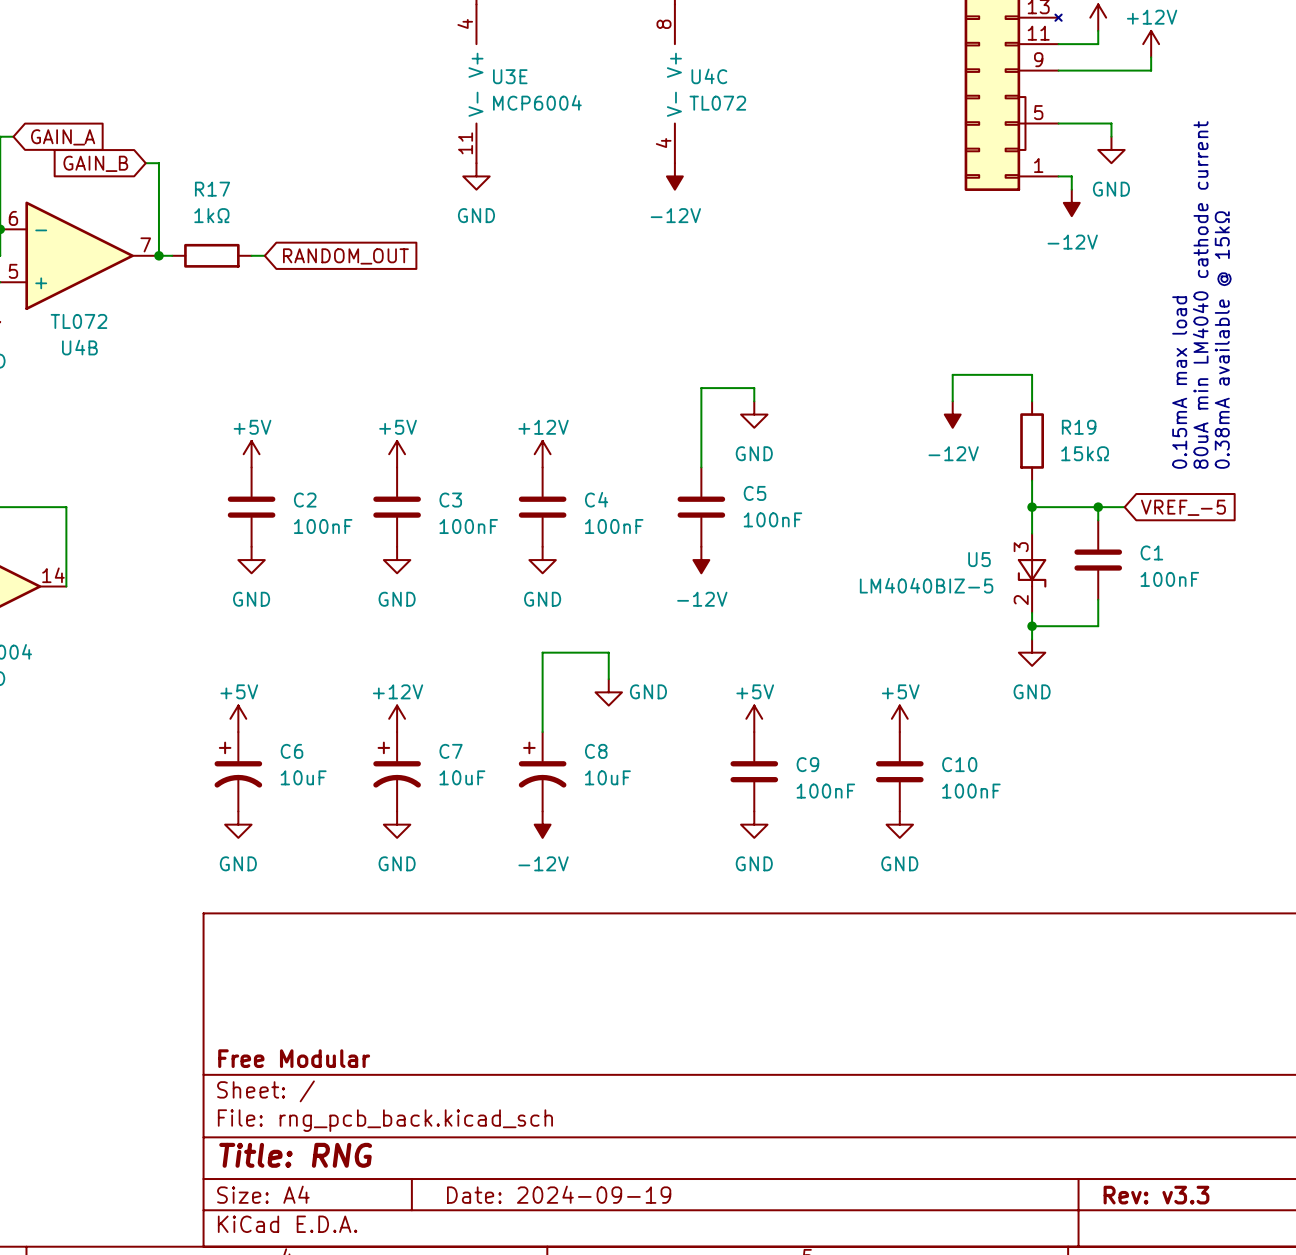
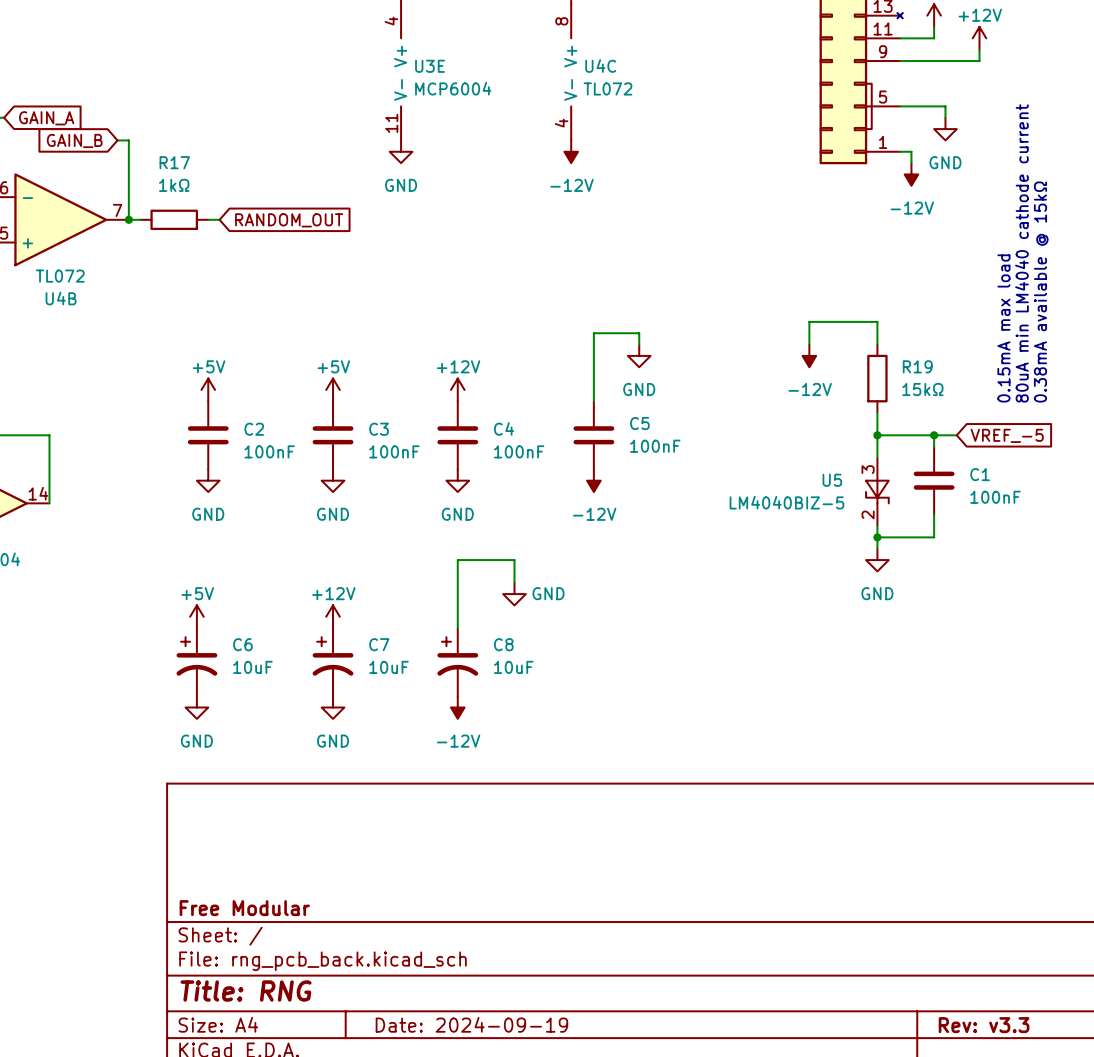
power symbol: +5V (754, 718) -> none
power symbol: +5V (899, 718) -> none
C9: 100nF (754, 771) -> none
C10: 100nF (899, 771) -> none
power symbol: GND (754, 824) -> none
power symbol: GND (899, 824) -> none

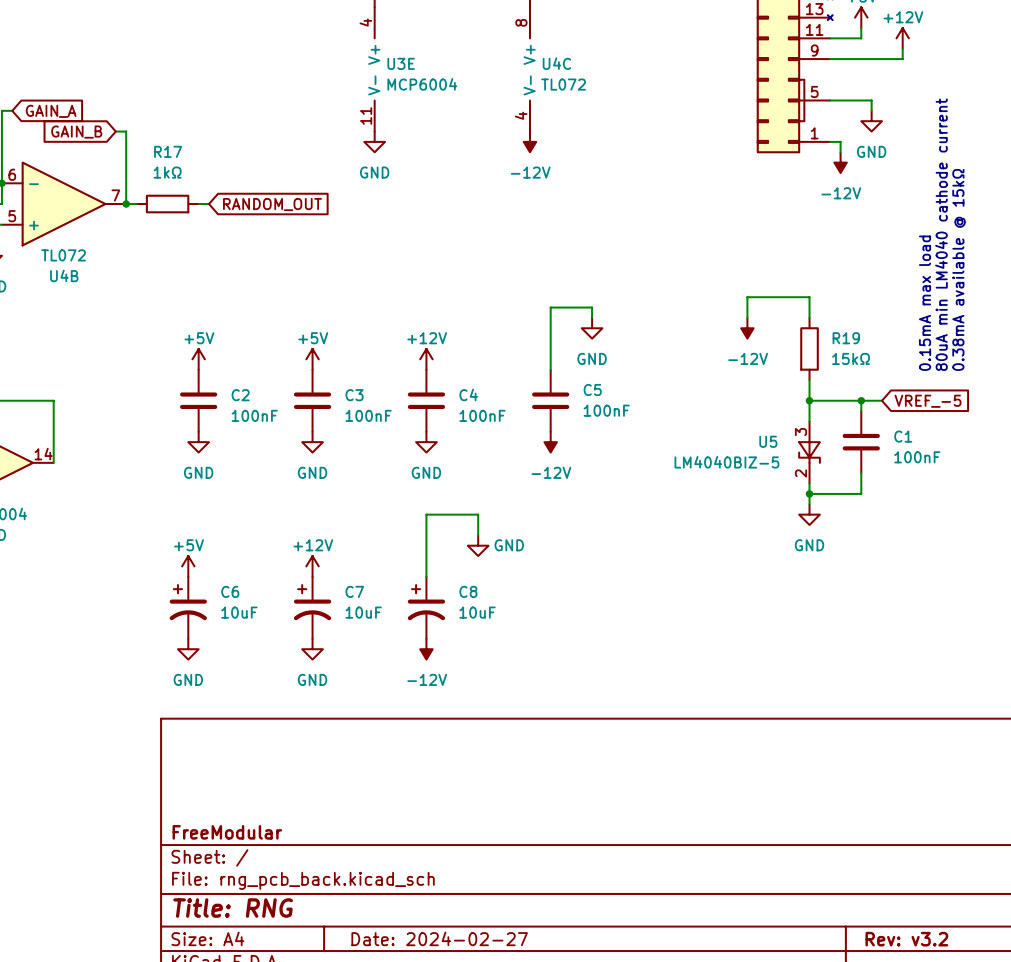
title block: Free Modular (244, 908) -> FreeModular (227, 832)
title block: Date: 2024-09-19 (471, 1024) -> Date: 2024-02-27 (439, 938)
title block: Rev: v3.3 (984, 1025) -> Rev: v3.2 (906, 939)

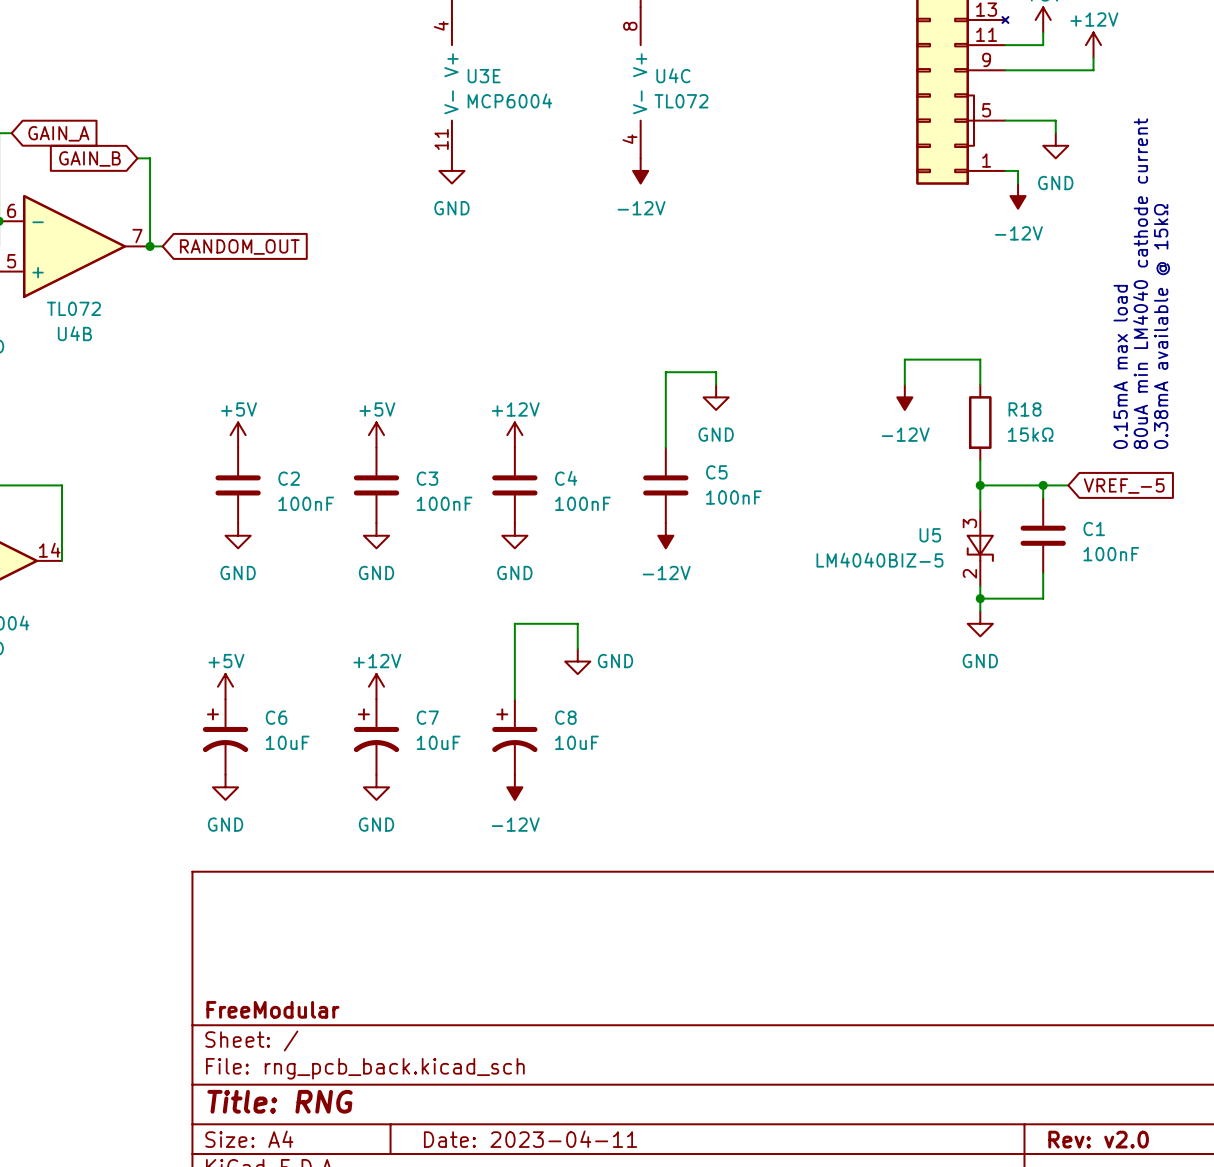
R17: 1kΩ (167, 204) -> none
global label position: RANDOM_OUT (272, 204) -> RANDOM_OUT (239, 247)
R19 name: R19 (846, 338) -> R18 (1025, 409)
title block: Date: 2024-02-27 (439, 938) -> Date: 2023-04-11 (530, 1139)
title block: Rev: v3.2 (906, 939) -> Rev: v2.0 (1098, 1139)

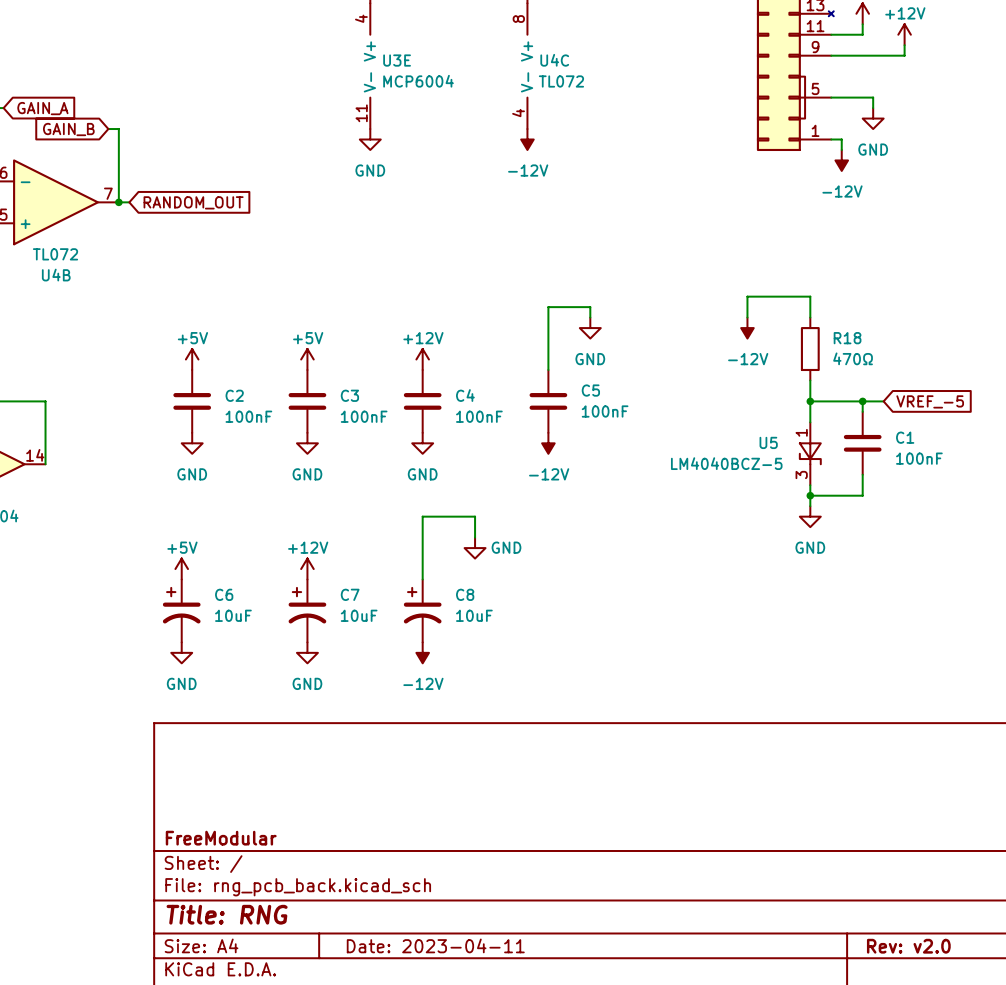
text: 80uA min LM4040 cathode current (1140, 283) -> none
text: 0.38mA available @ 15kΩ (1162, 326) -> none
text: 0.15mA max load (1120, 366) -> none
R18 value: 15kΩ (1030, 434) -> 470Ω (853, 358)
U5 pin number: 3 (969, 523) -> 1 (801, 432)
U5 value: LM4040BIZ-5 (879, 560) -> LM4040BCZ-5 (726, 463)
U5 pin number: 2 (969, 573) -> 3 (801, 474)

